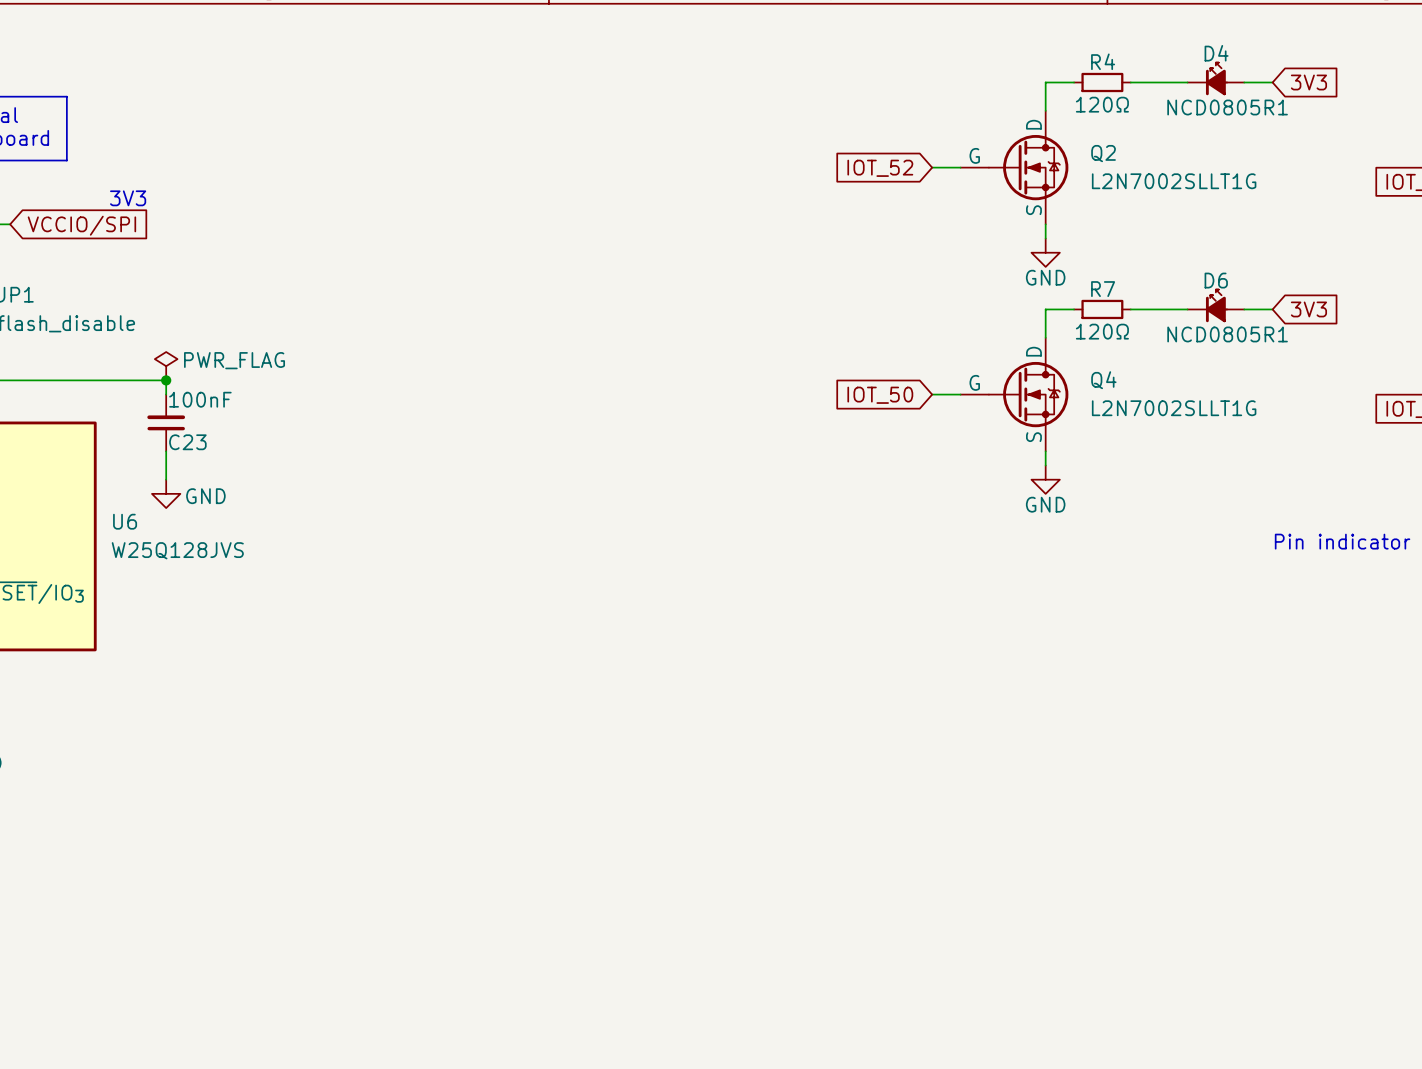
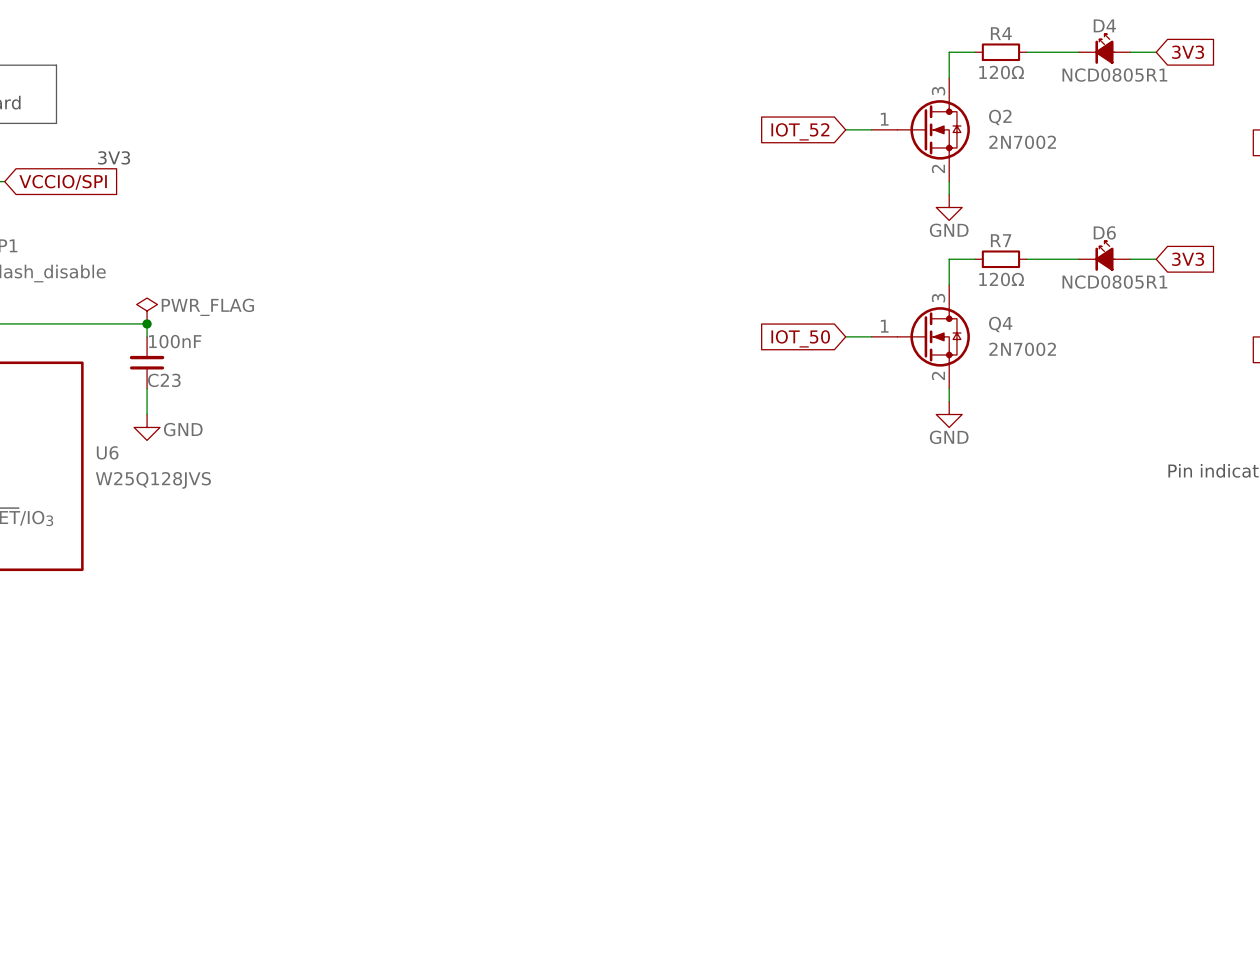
Q2 symbol: [960, 110, 1069, 225] -> [871, 78, 970, 182]
Q2 value: L2N7002SLLT1G (1174, 181) -> 2N7002 (1022, 142)
Q4 symbol: [960, 337, 1069, 452] -> [871, 285, 970, 389]
Q4 value: L2N7002SLLT1G (1174, 408) -> 2N7002 (1022, 349)

